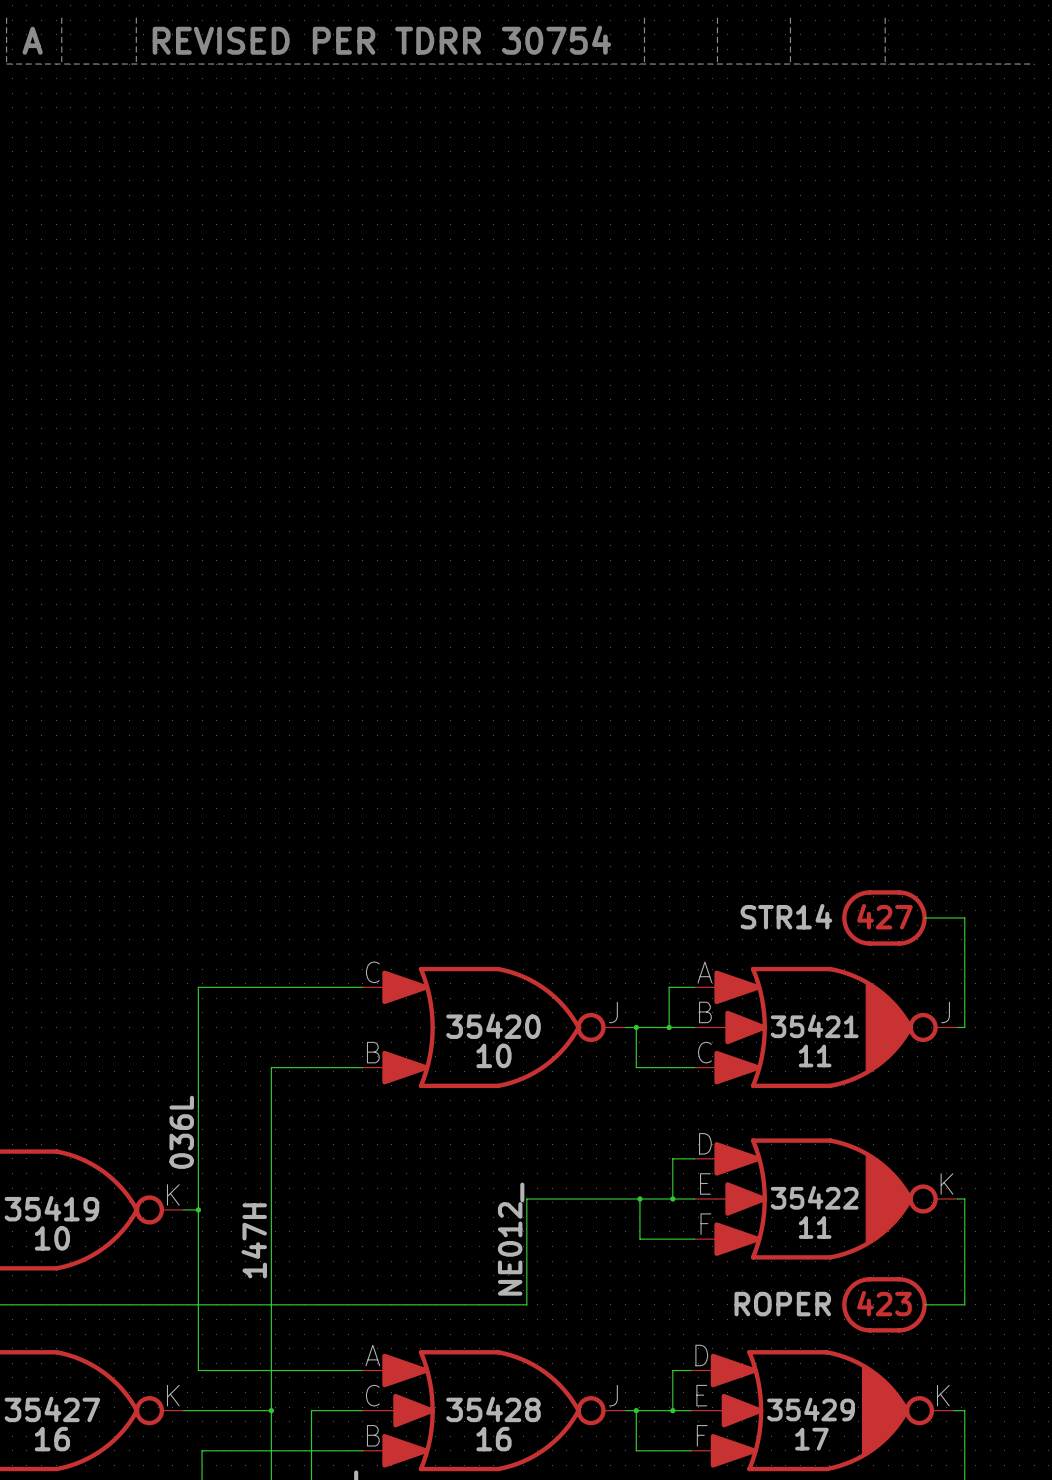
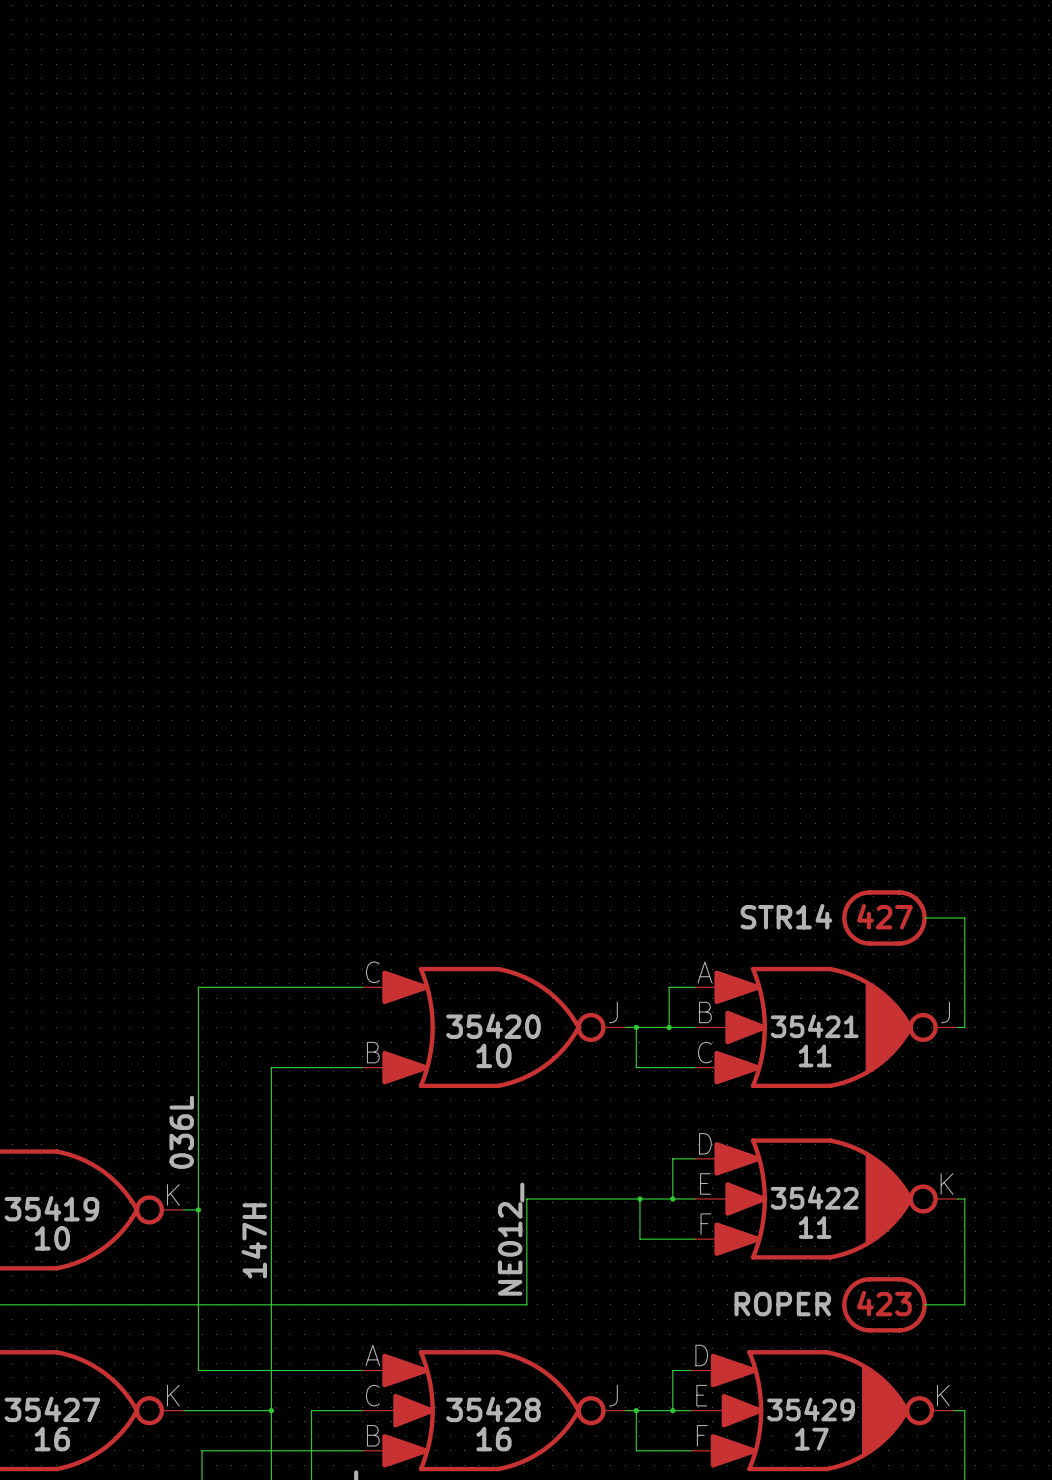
line: (6, 17) (6, 64) (1034, 64) -> none
line: (61, 17) (61, 64) -> none
line: (136, 17) (136, 63) -> none
line: (644, 17) (644, 64) -> none
line: (717, 17) (717, 64) -> none
line: (790, 17) (790, 64) -> none
line: (885, 17) (885, 64) -> none
text: A REVISED PER TDRR 30754 (316, 40) -> none

